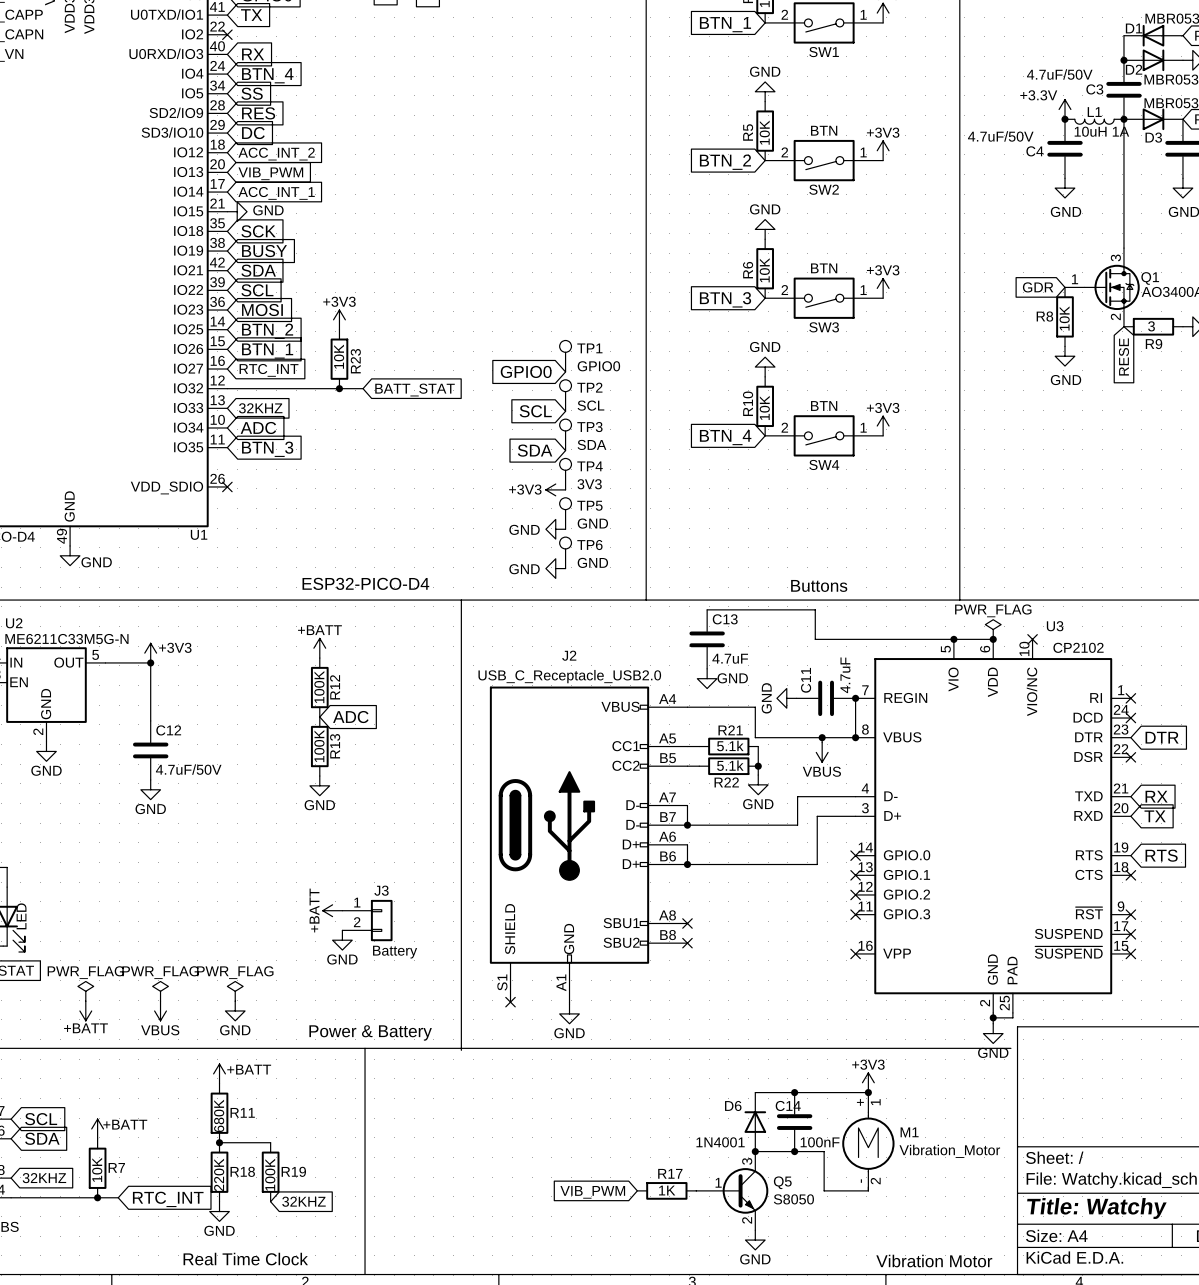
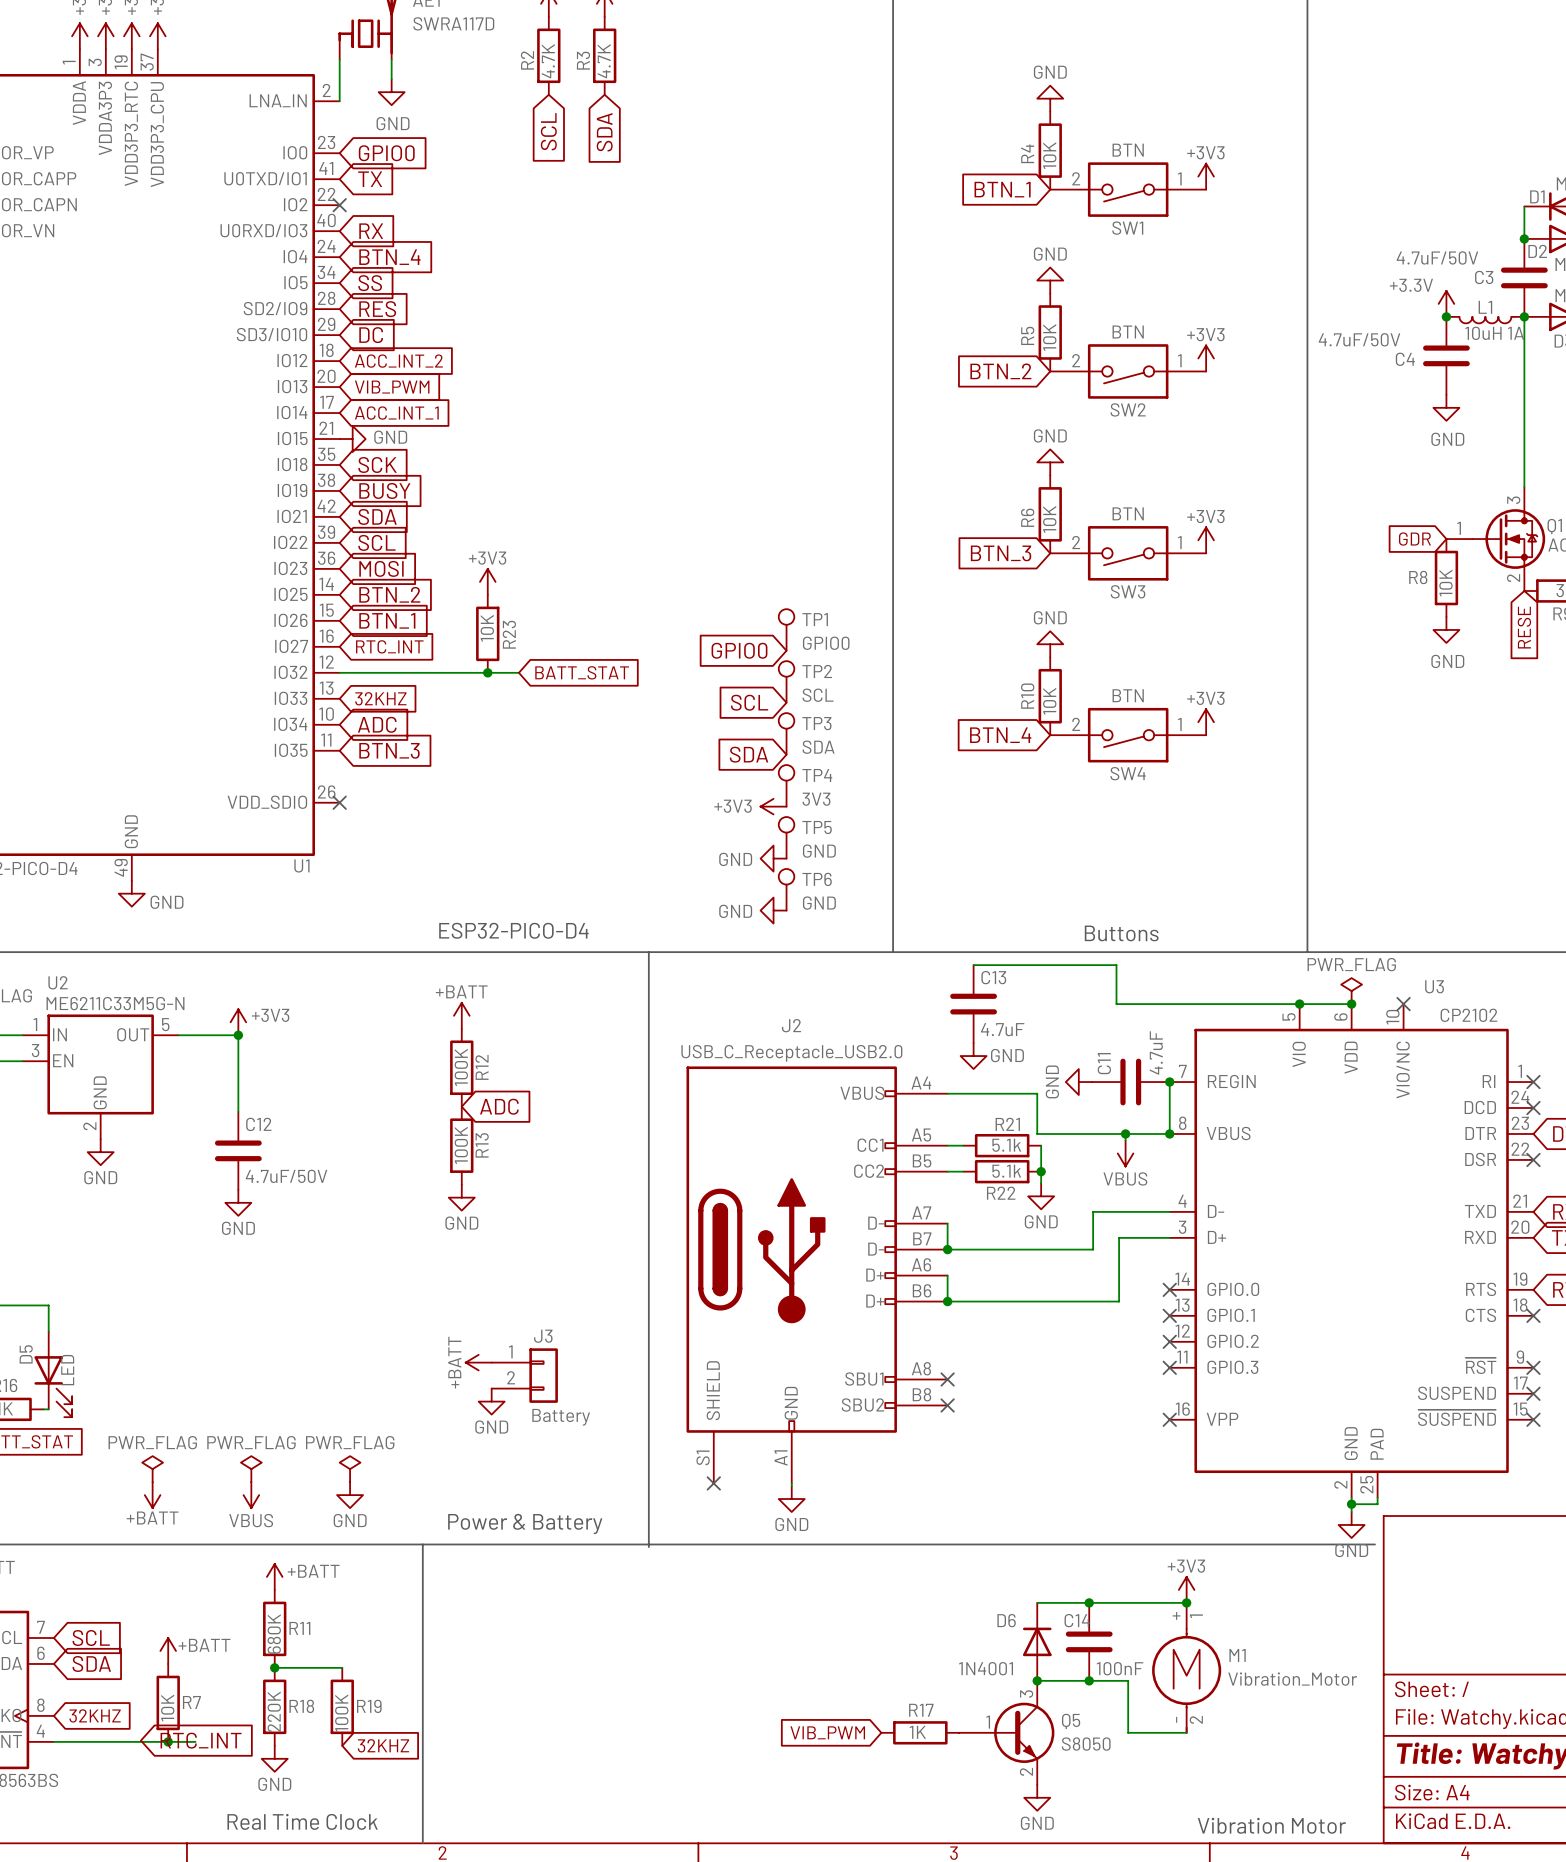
line: (365, 1048) (365, 1274) -> (422, 1544) (422, 1843)
power symbol position: +BATT (219, 1073) -> +BATT (274, 1576)
R11 position: (219, 1113) -> (274, 1628)
wire: (219, 1142) (270, 1142) -> (274, 1667) (342, 1667)
junction position: (219, 1142) -> (274, 1667)
R18 position: (219, 1172) -> (274, 1706)
R19 position: (270, 1172) -> (342, 1706)
global label position: RTC_INT (168, 1199) -> RTC_INT (201, 1740)
global label position: 32KHZ (303, 1201) -> 32KHZ (383, 1745)
power symbol position: GND (219, 1211) -> GND (274, 1758)
text position: Real Time Clock (245, 1259) -> Real Time Clock (302, 1821)

